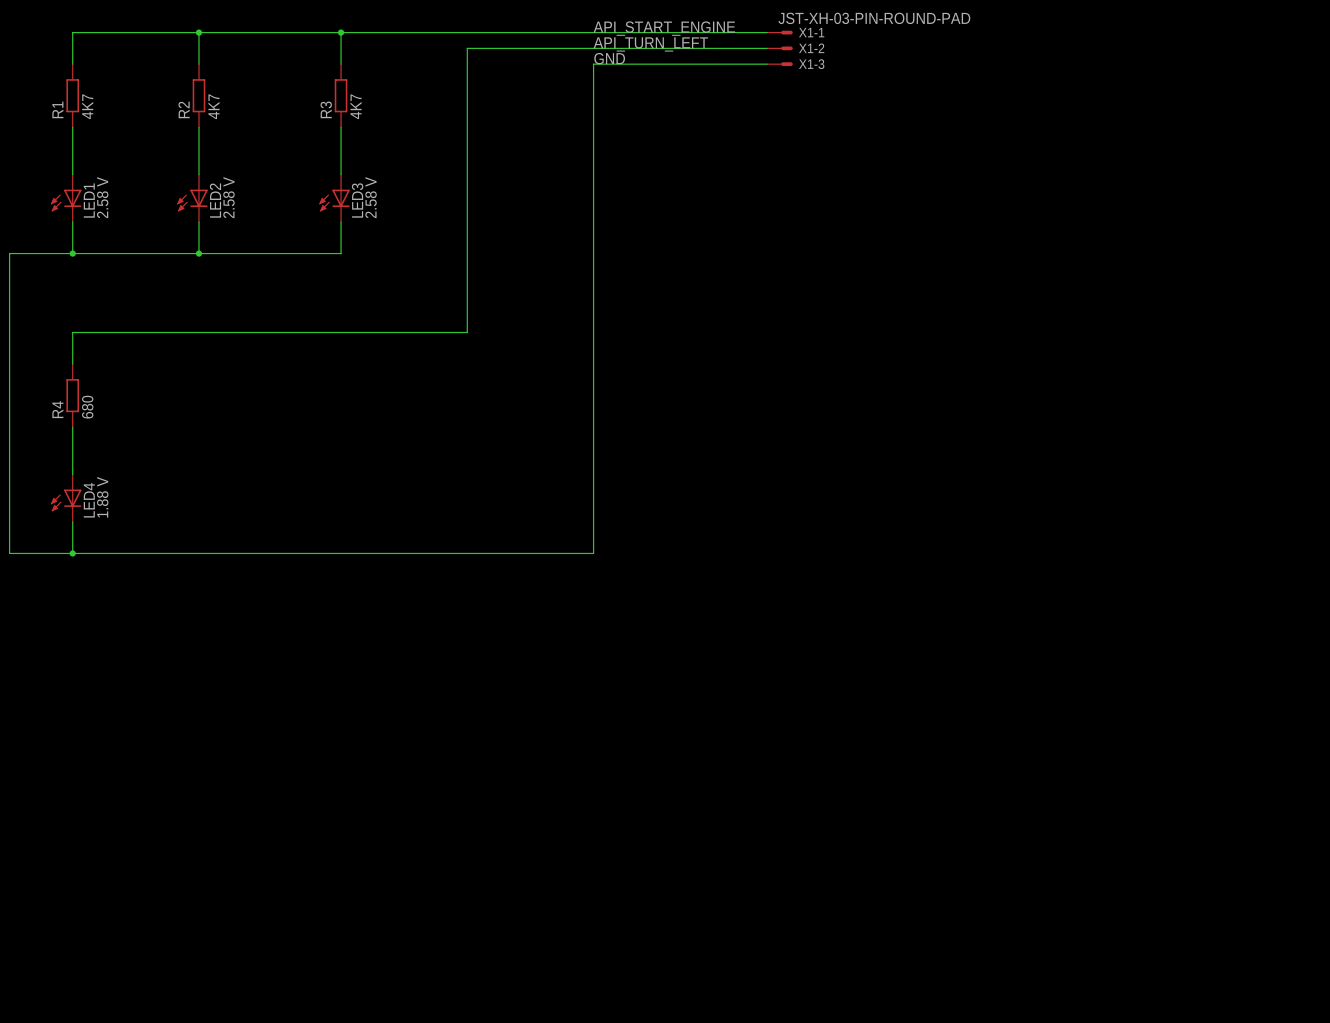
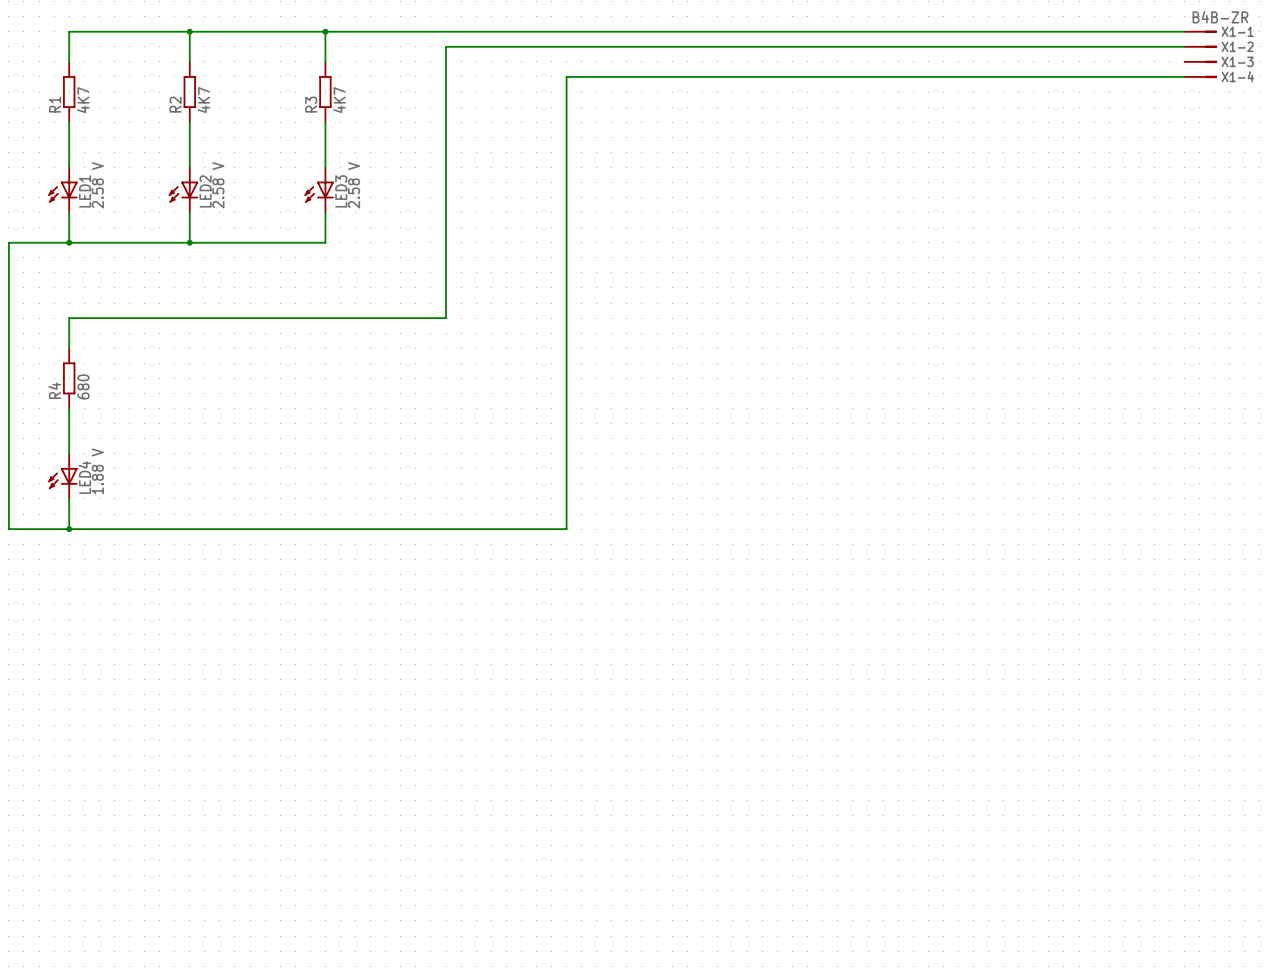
X1-1 value: JST-XH-03-PIN-ROUND-PAD (874, 18) -> B4B-ZR (1220, 17)
label: API_START_ENGINE (664, 28) -> none
X1-1 symbol: [767, 30, 793, 35] -> [1184, 30, 1218, 33]
wire: none -> (732, 31) (1184, 31)
label: API_TURN_LEFT (650, 44) -> none
X1-2 symbol: [767, 46, 793, 51] -> [1184, 45, 1218, 49]
wire: none -> (732, 46) (1184, 46)
label: GND (609, 58) -> none
X1-3 symbol: [767, 62, 793, 67] -> [1184, 60, 1218, 64]
wire: (767, 64) (593, 64) (593, 79) -> (1184, 76) (566, 76)
X1-4: none -> (1200, 76)

